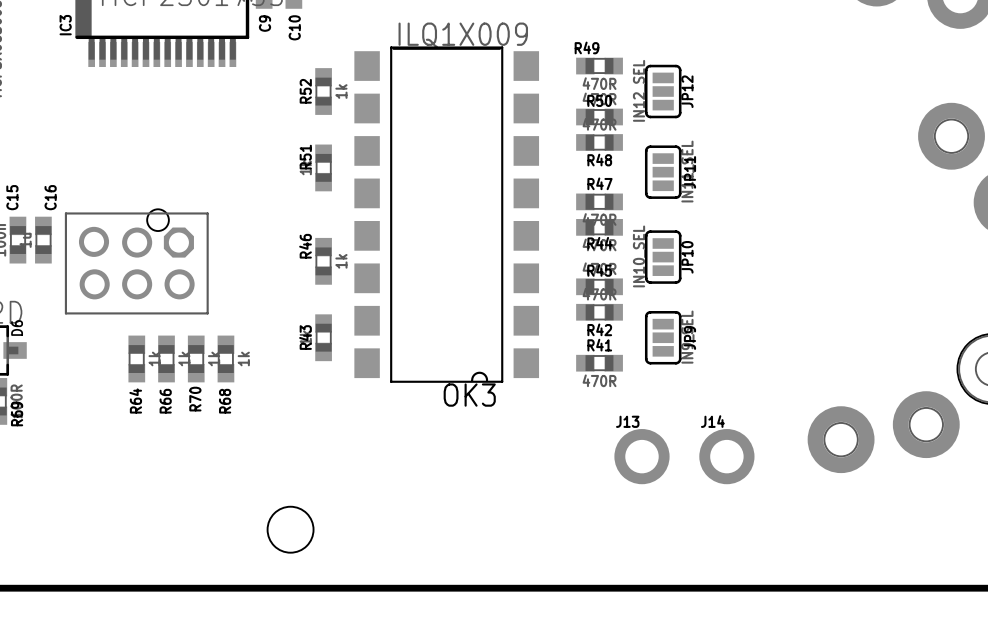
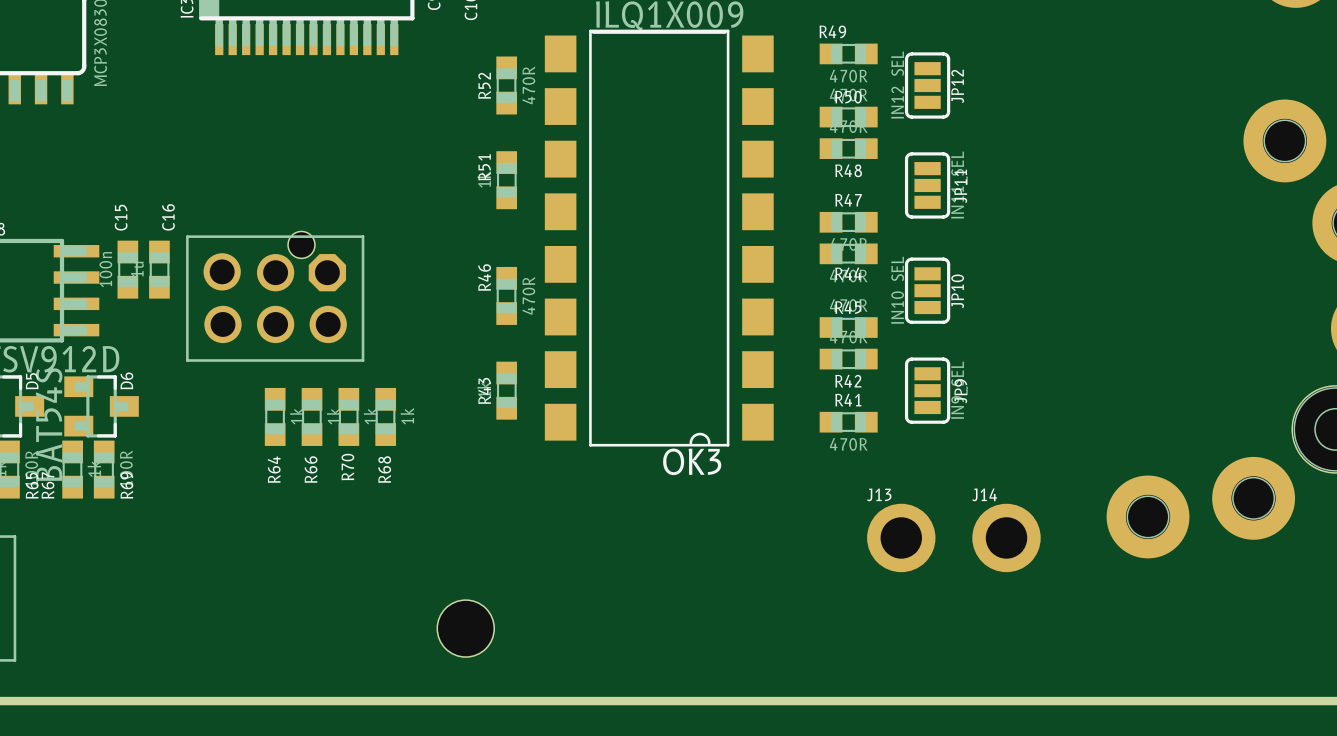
R52 value: 1k (341, 91) -> 470R (528, 85)
R46 value: 1k (341, 261) -> 470R (528, 295)

